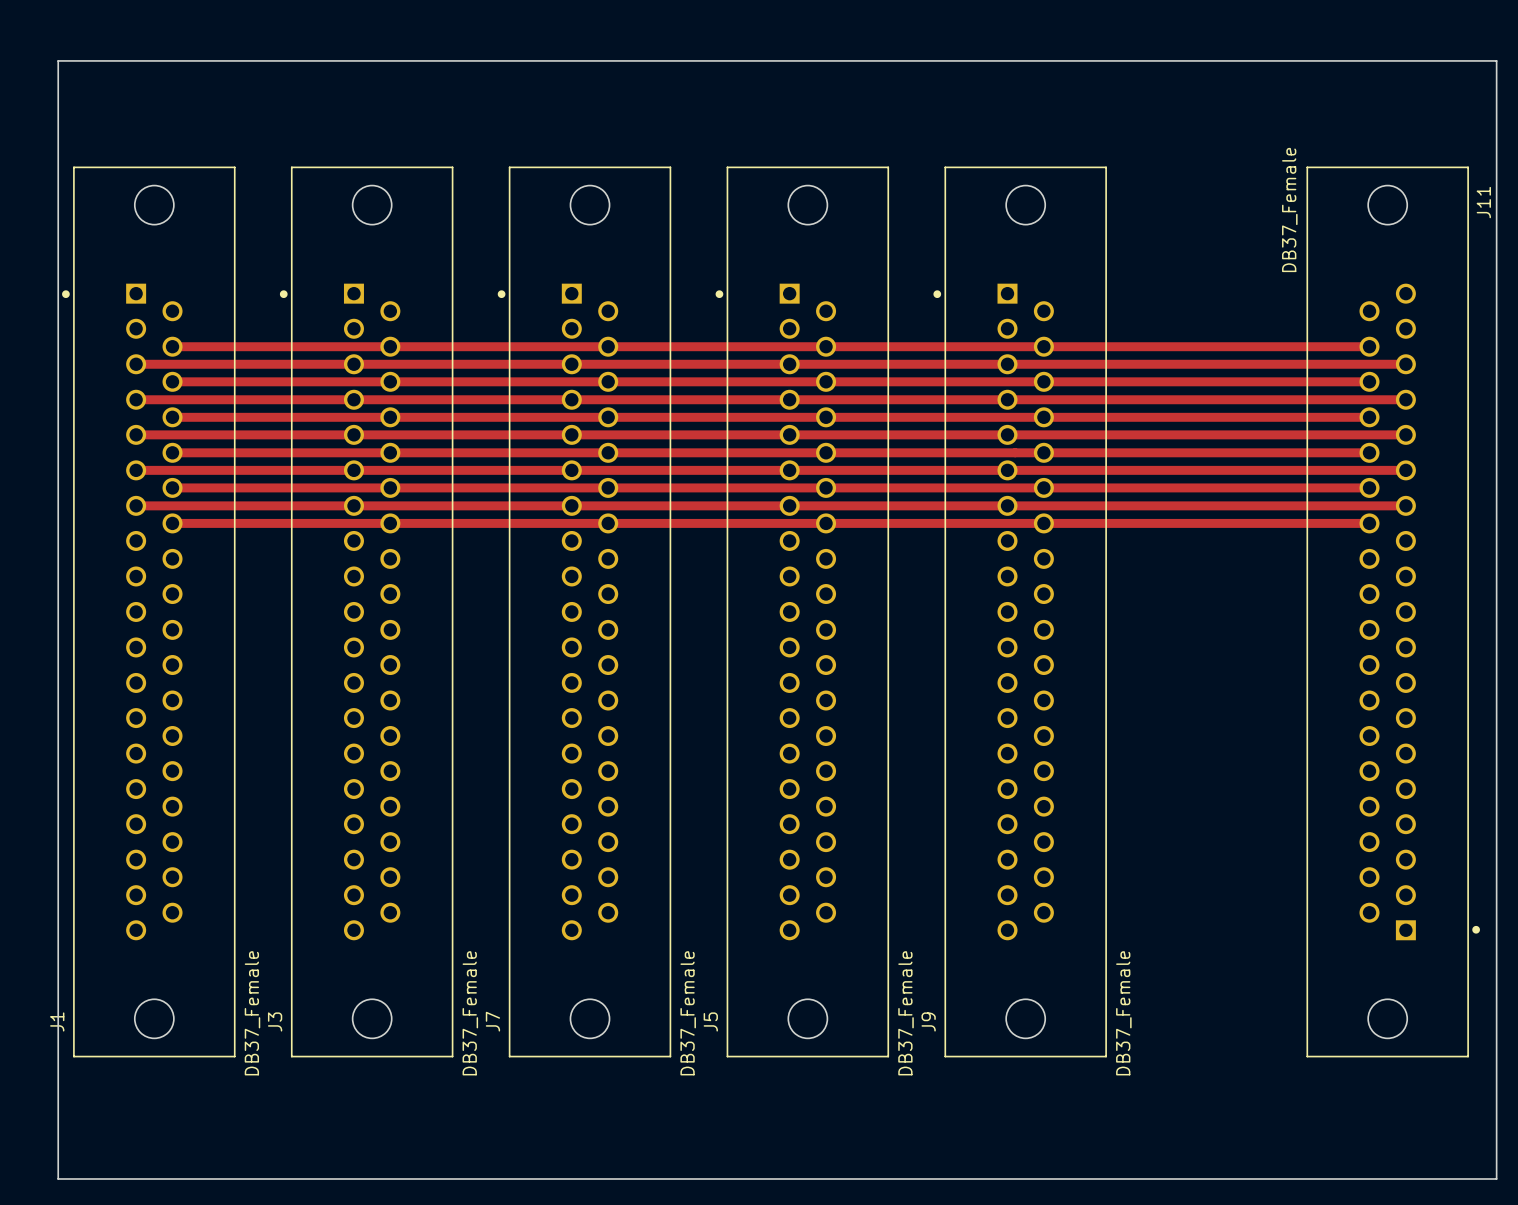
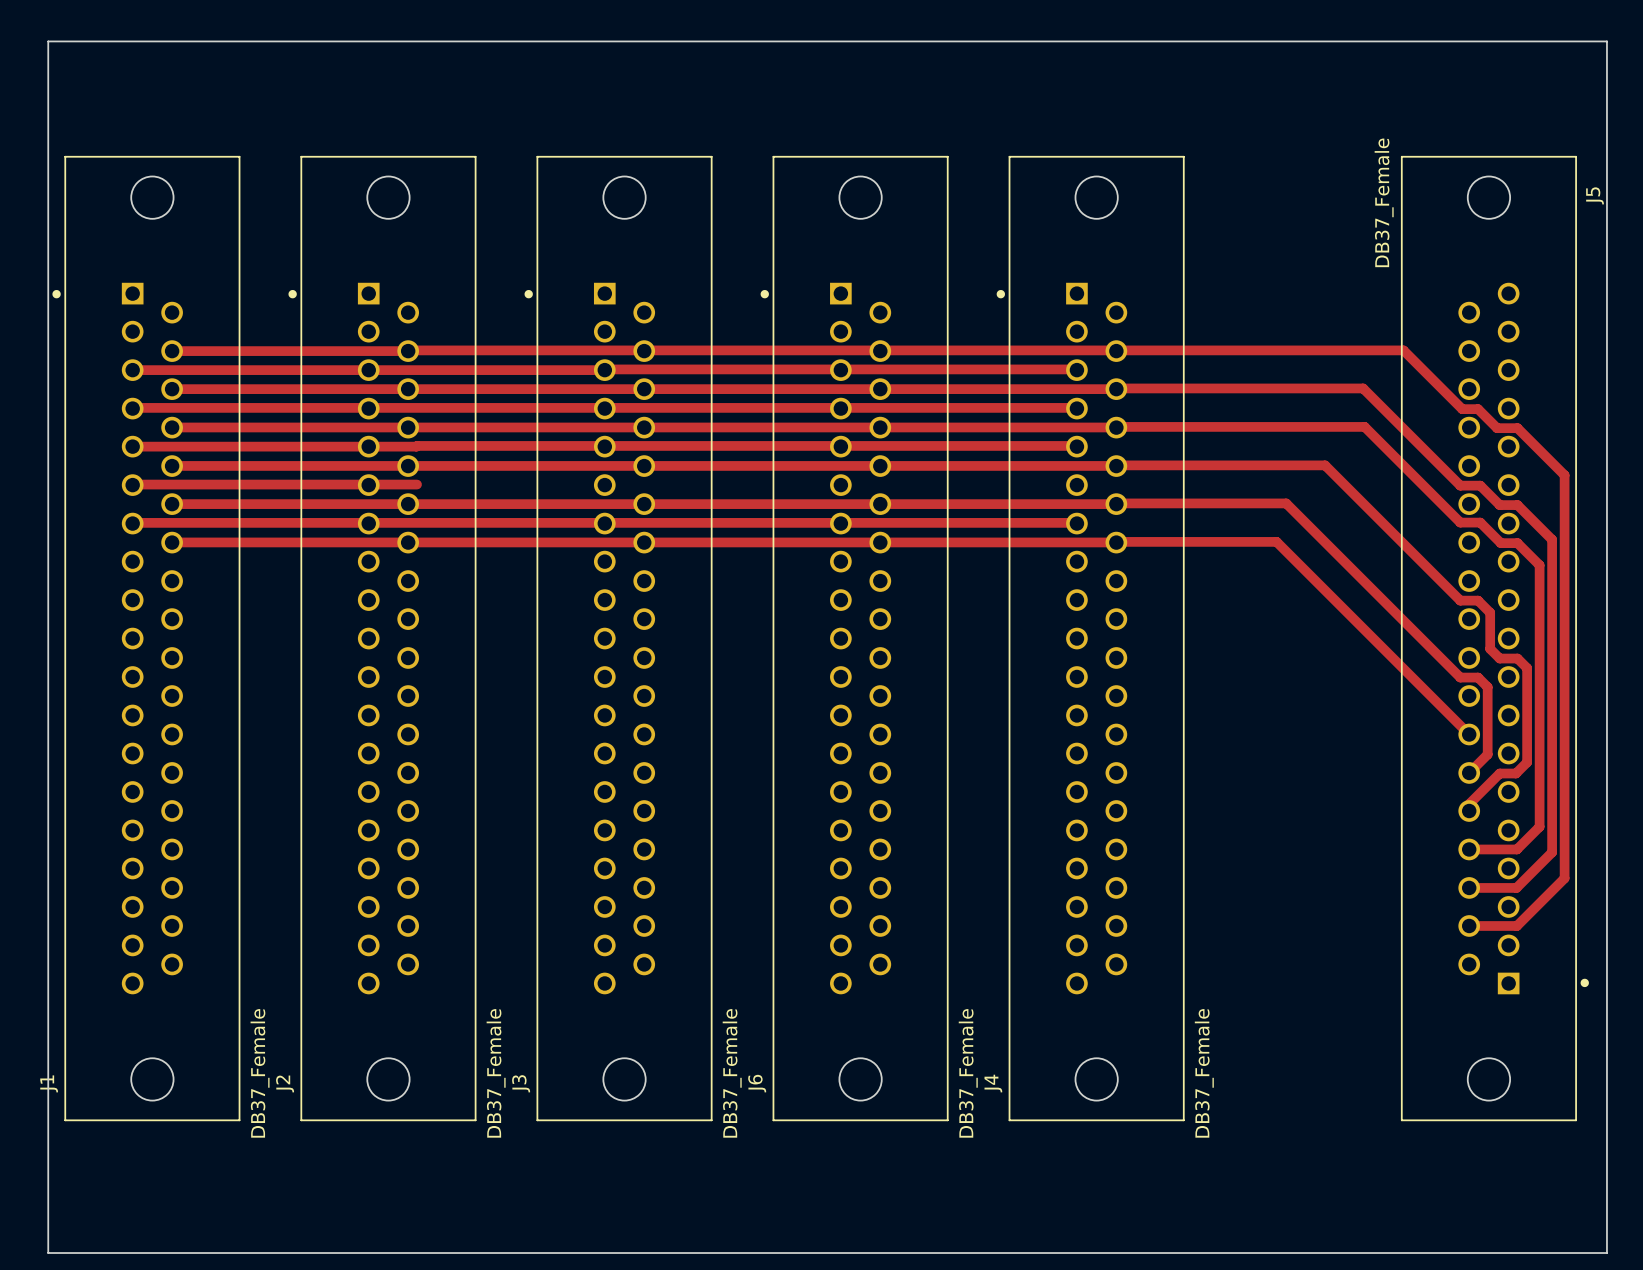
J11 name: J11 (1483, 202) -> J5 (1595, 195)
track: (390, 346) (1369, 346) -> (408, 351) (1403, 350) (1462, 409) (1478, 409) (1497, 428) (1517, 428) (1564, 475) (1564, 878) (1516, 925) (1469, 925)
track: (571, 364) (1405, 364) -> (604, 370) (1076, 369)
track: (1043, 381) (1369, 381) -> (1115, 389) (1363, 388) (1460, 485) (1480, 485) (1499, 505) (1517, 505) (1552, 539) (1552, 852) (1516, 887) (1469, 887)
track: (136, 399) (1405, 399) -> (132, 408) (1076, 407)
track: (172, 417) (1369, 417) -> (172, 427) (1364, 426) (1460, 522) (1480, 522) (1500, 543) (1517, 543) (1539, 565) (1539, 826) (1516, 849) (1469, 849)
track: (398, 434) (1405, 434) -> (416, 446) (1076, 445)
track: (172, 452) (1369, 452) -> (172, 465) (1325, 465) (1460, 600) (1478, 600) (1490, 612) (1490, 648) (1499, 658) (1517, 658) (1527, 668) (1527, 762) (1515, 773) (1499, 773) (1469, 804) (1469, 811)
track: (136, 470) (1405, 470) -> (132, 485) (417, 484)
track: (1043, 487) (1369, 487) -> (1115, 504) (1286, 503) (1460, 677) (1478, 677) (1487, 687) (1487, 754) (1469, 772)
track: (136, 505) (1405, 505) -> (132, 523) (1076, 522)
track: (172, 523) (1369, 523) -> (172, 542) (1276, 541) (1469, 734)
J3 name: J3 (275, 1021) -> J2 (285, 1083)
J7 name: J7 (492, 1021) -> J3 (521, 1083)
J5 name: J5 (710, 1021) -> J6 (757, 1083)
J9 name: J9 (928, 1021) -> J4 (993, 1083)

